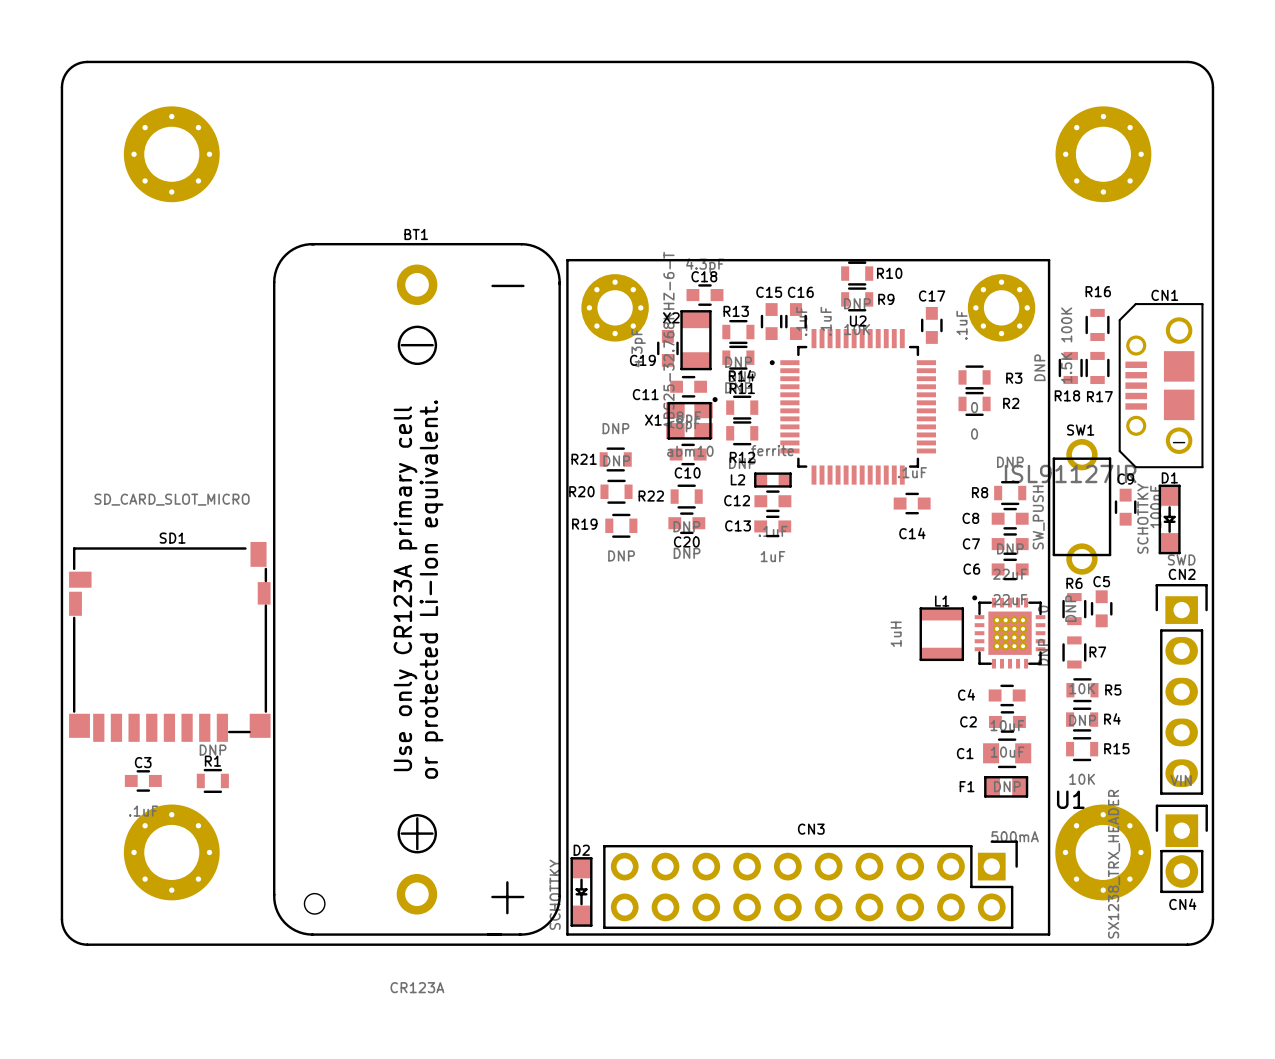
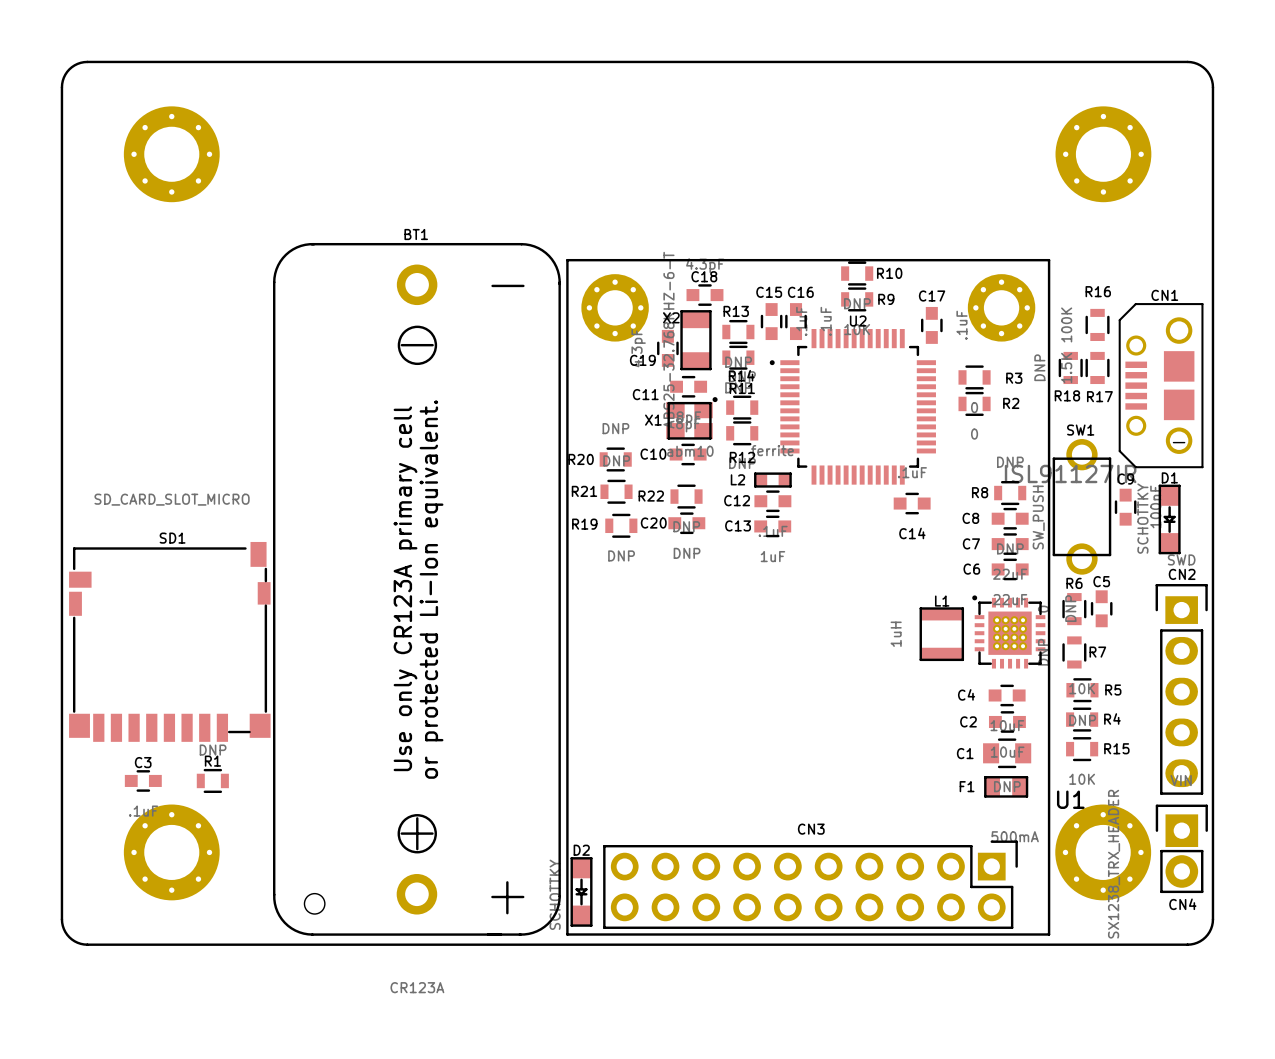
R21 name: R21 (584, 459) -> R20 (581, 459)
C10 name position: C10 (687, 472) -> C10 (653, 454)
R20 name: R20 (581, 491) -> R21 (584, 491)
C20 name position: C20 (686, 541) -> C20 (653, 523)

